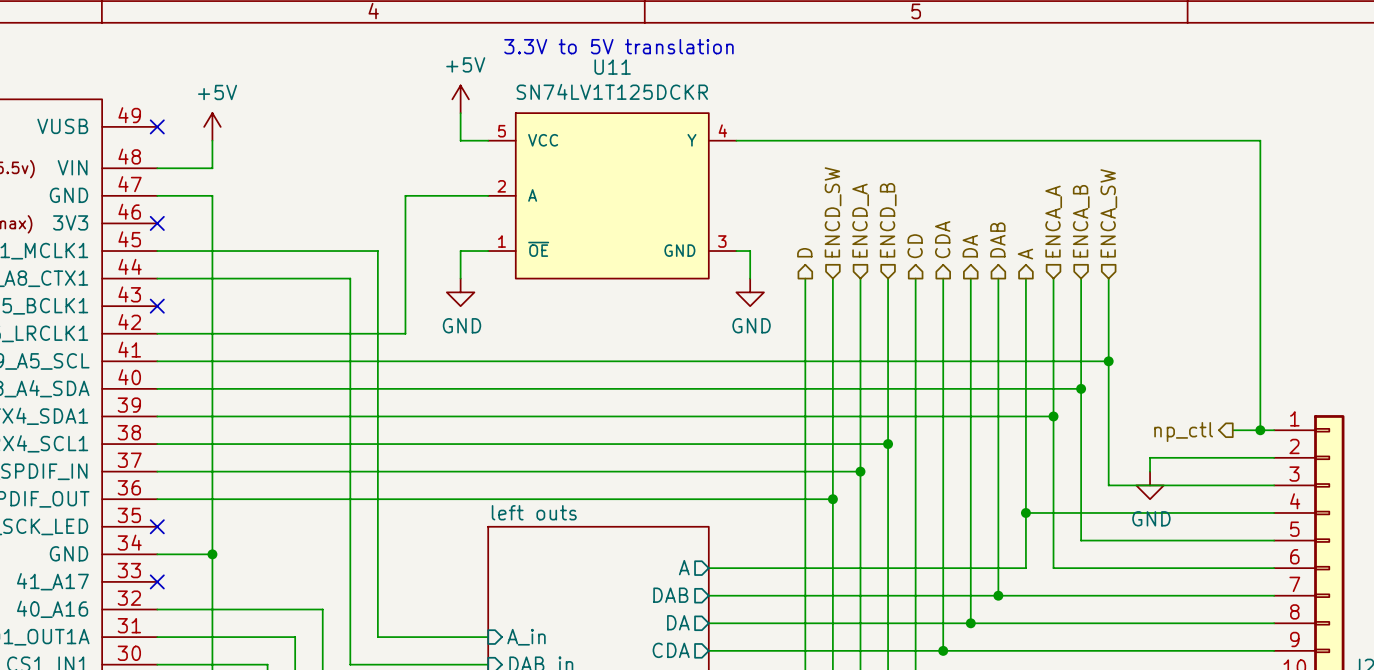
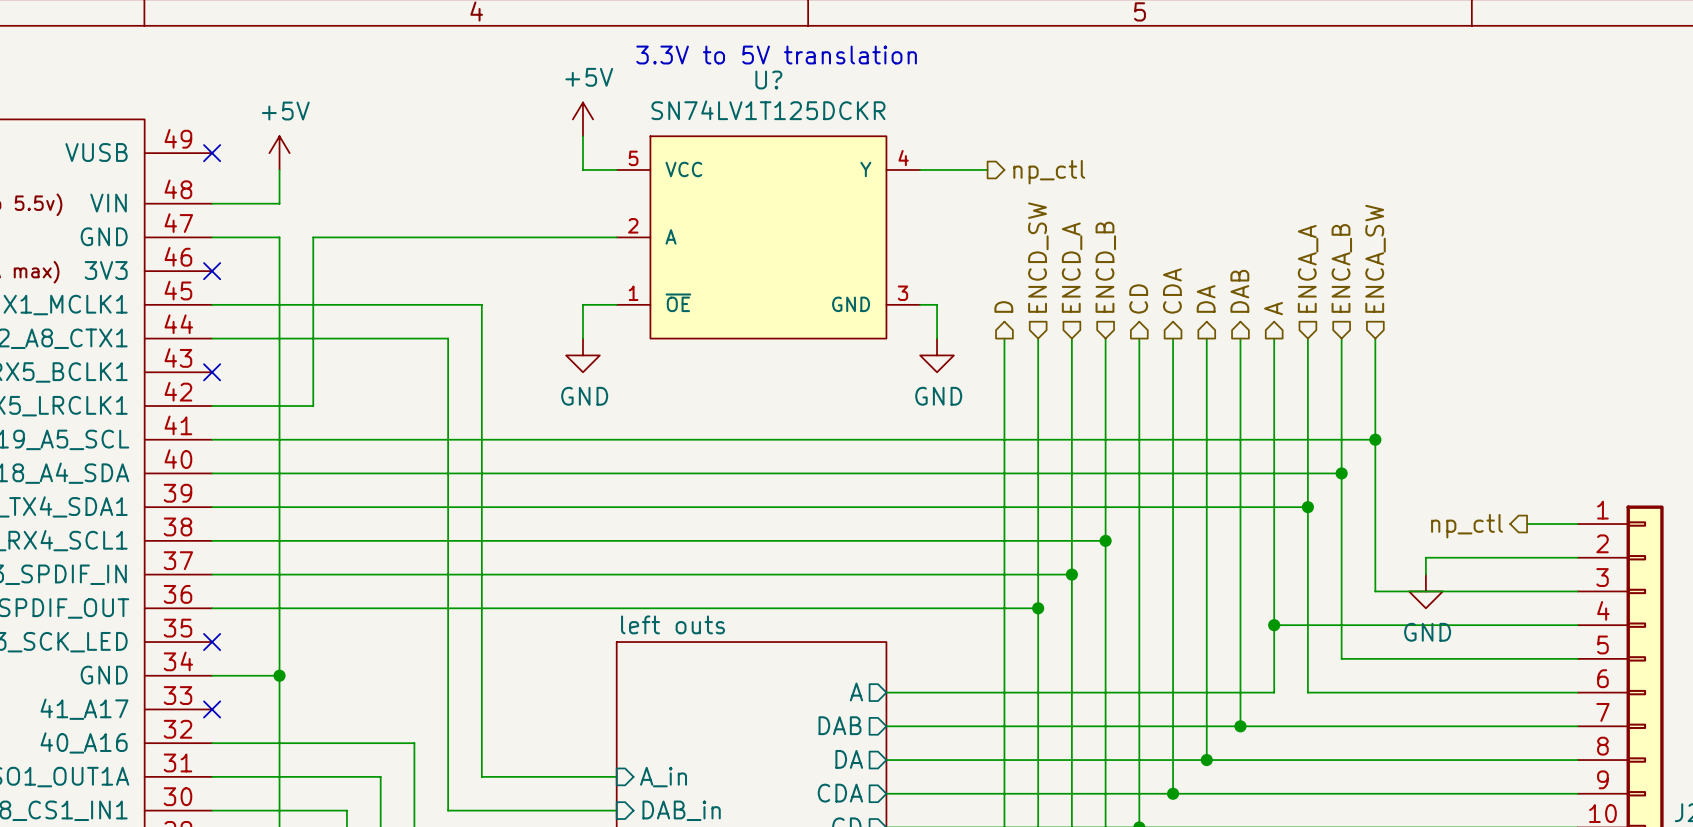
U11 name: U11 (612, 67) -> U? (768, 80)
wire: (791, 140) (1260, 140) (1260, 430) -> none
hierarchical label: none -> np_ctl (1049, 172)
wire: (405, 195) (405, 333) (240, 333) -> (515, 237) (313, 237) (313, 406)
junction: (1260, 430) -> none

